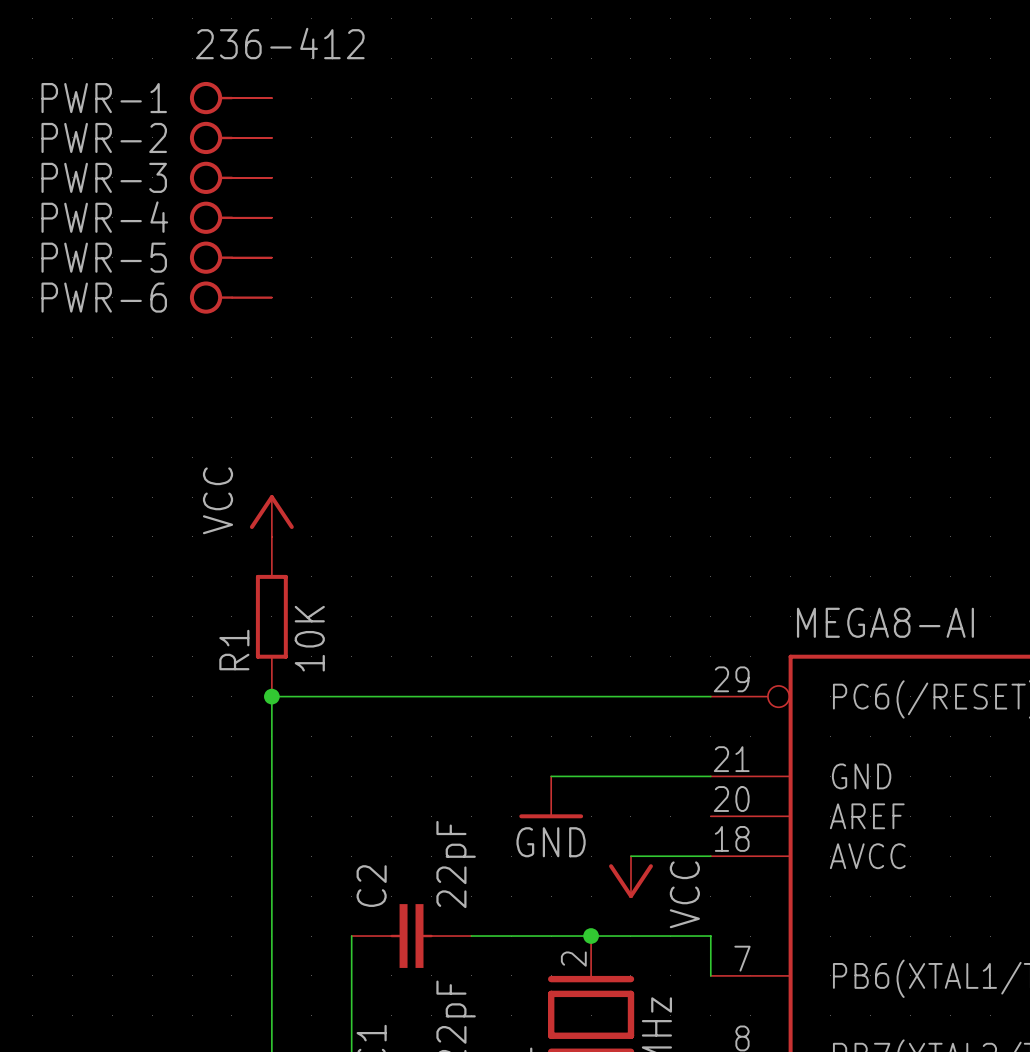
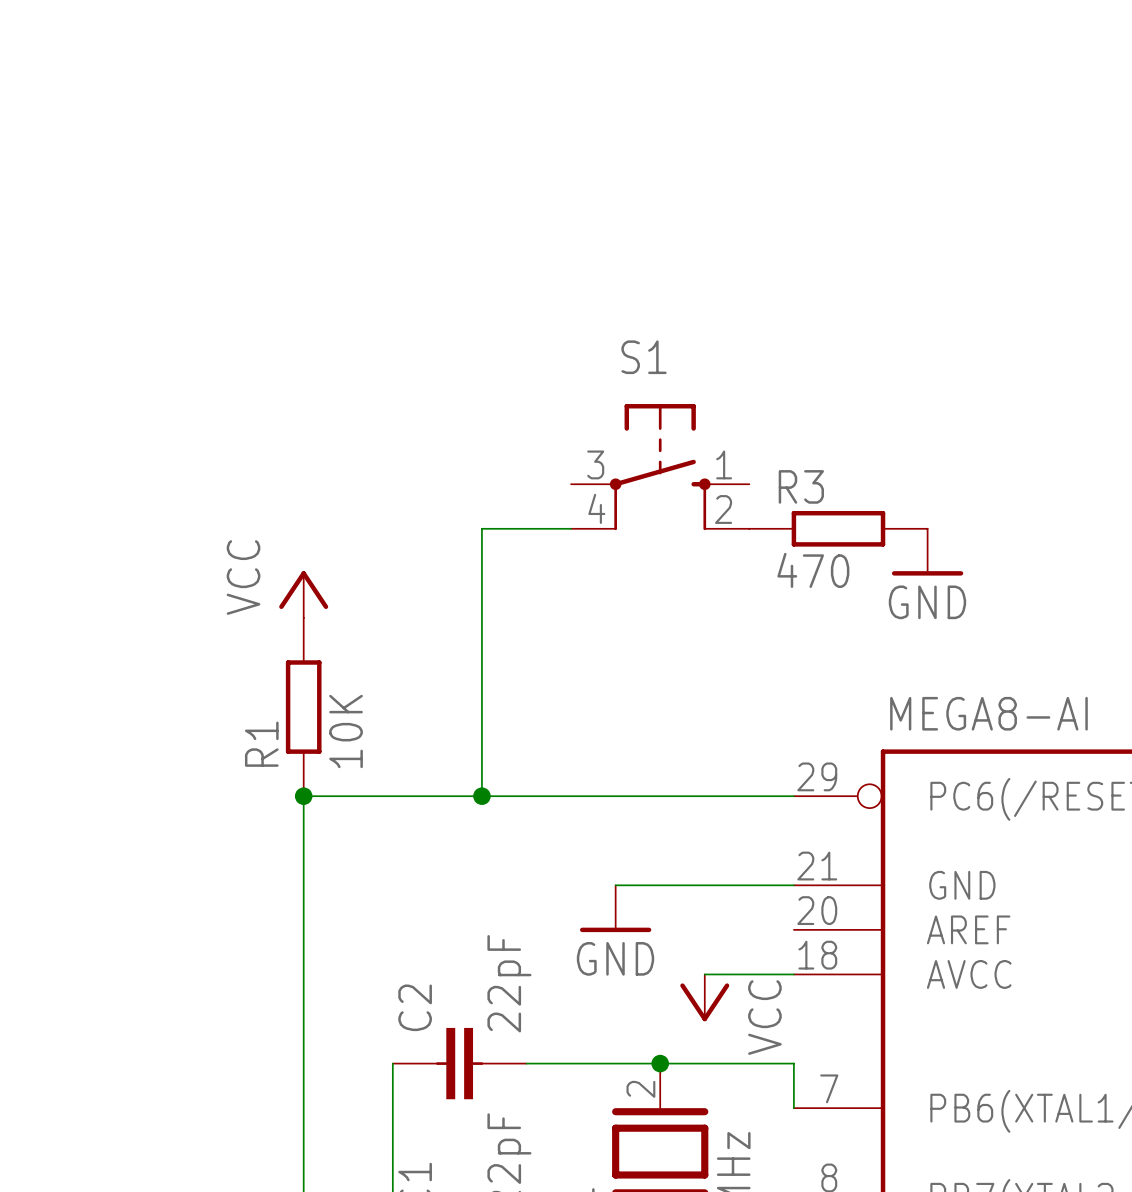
PWR-1: 236-412 (230, 98) -> none
PWR-2: (230, 137) -> none
PWR-3: (230, 177) -> none
PWR-4: (230, 217) -> none
PWR-5: (230, 257) -> none
PWR-6: (230, 297) -> none
S1: none -> (660, 467)
wire: none -> (571, 528) (481, 528) (481, 796)
R3: none -> 470 (838, 528)
power symbol: none -> GND (927, 552)
junction: none -> (481, 796)

